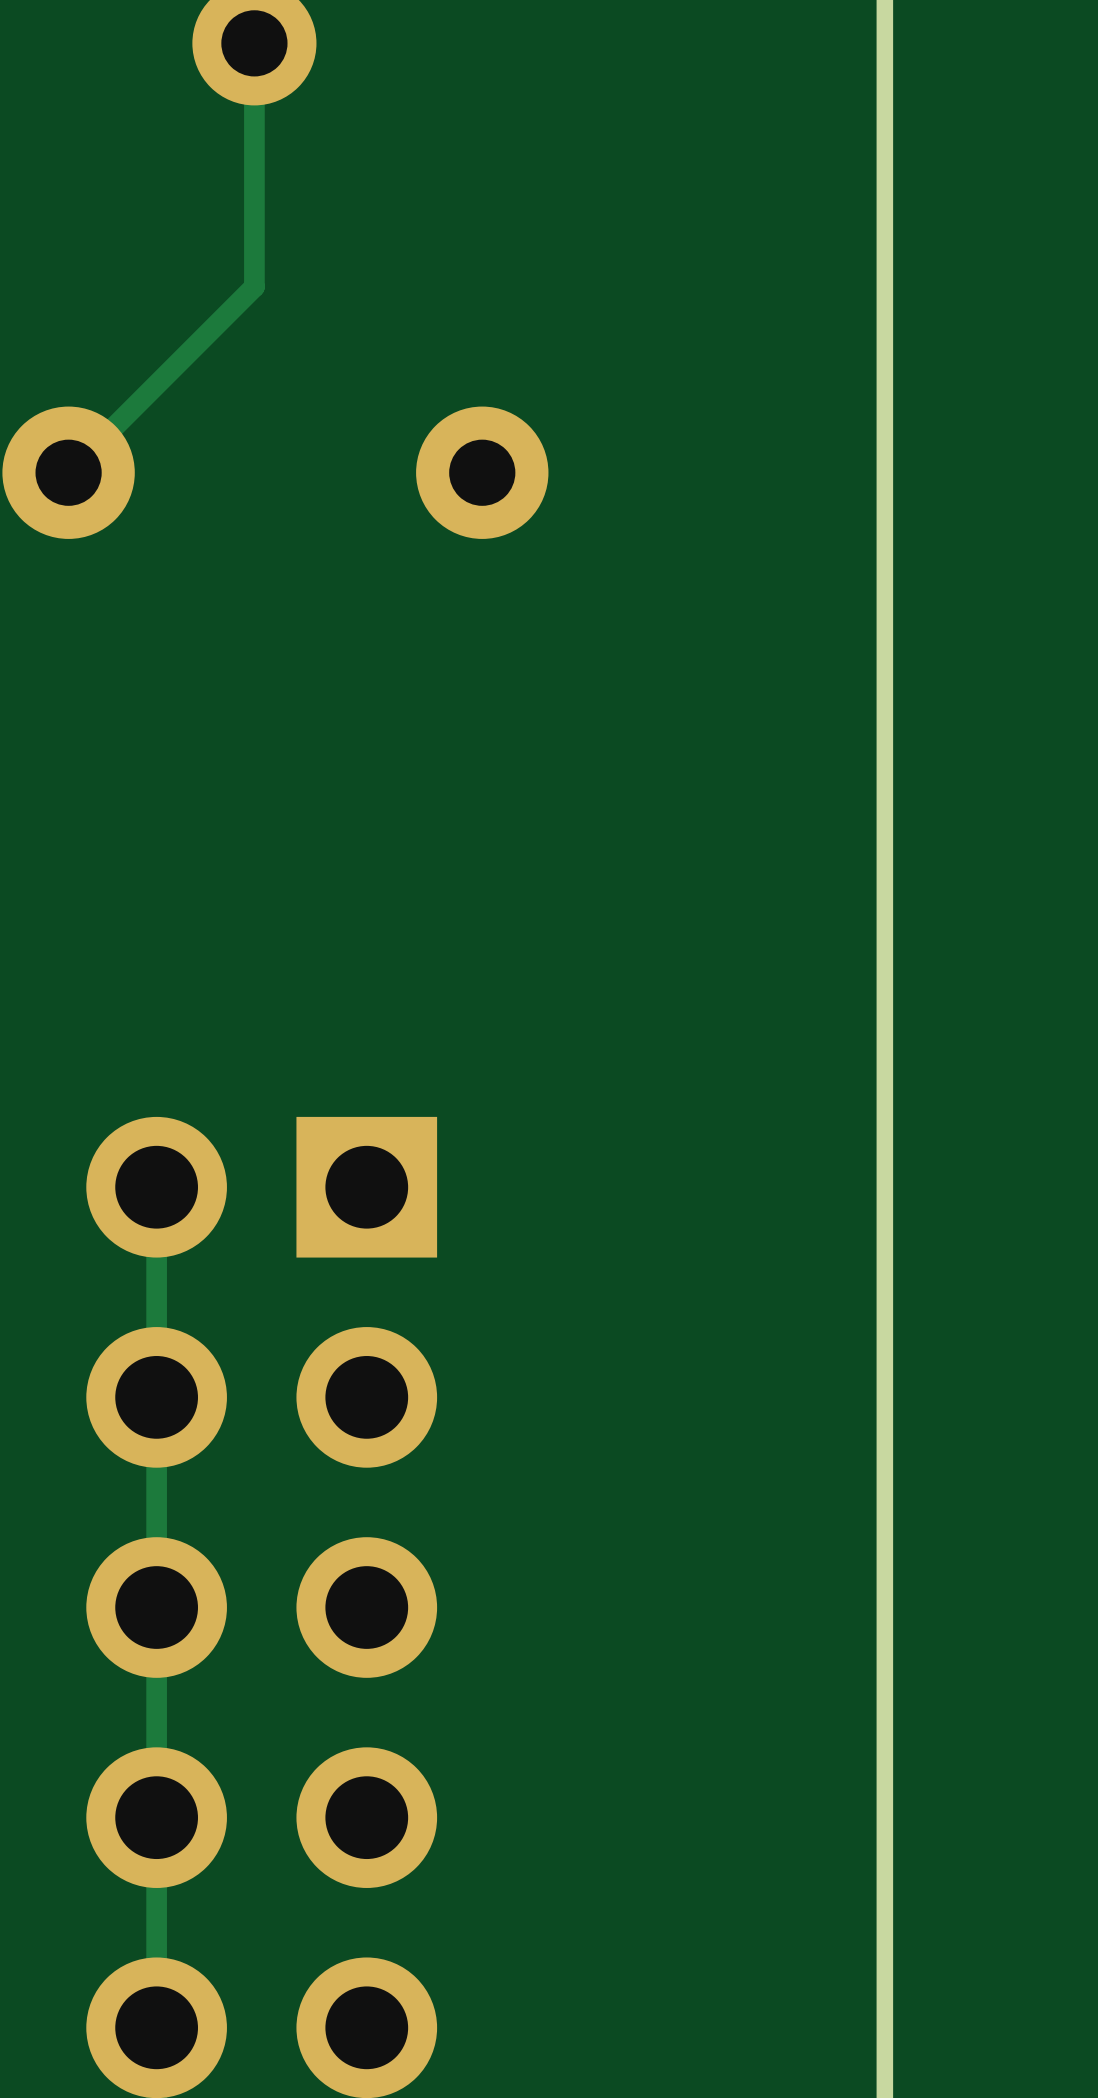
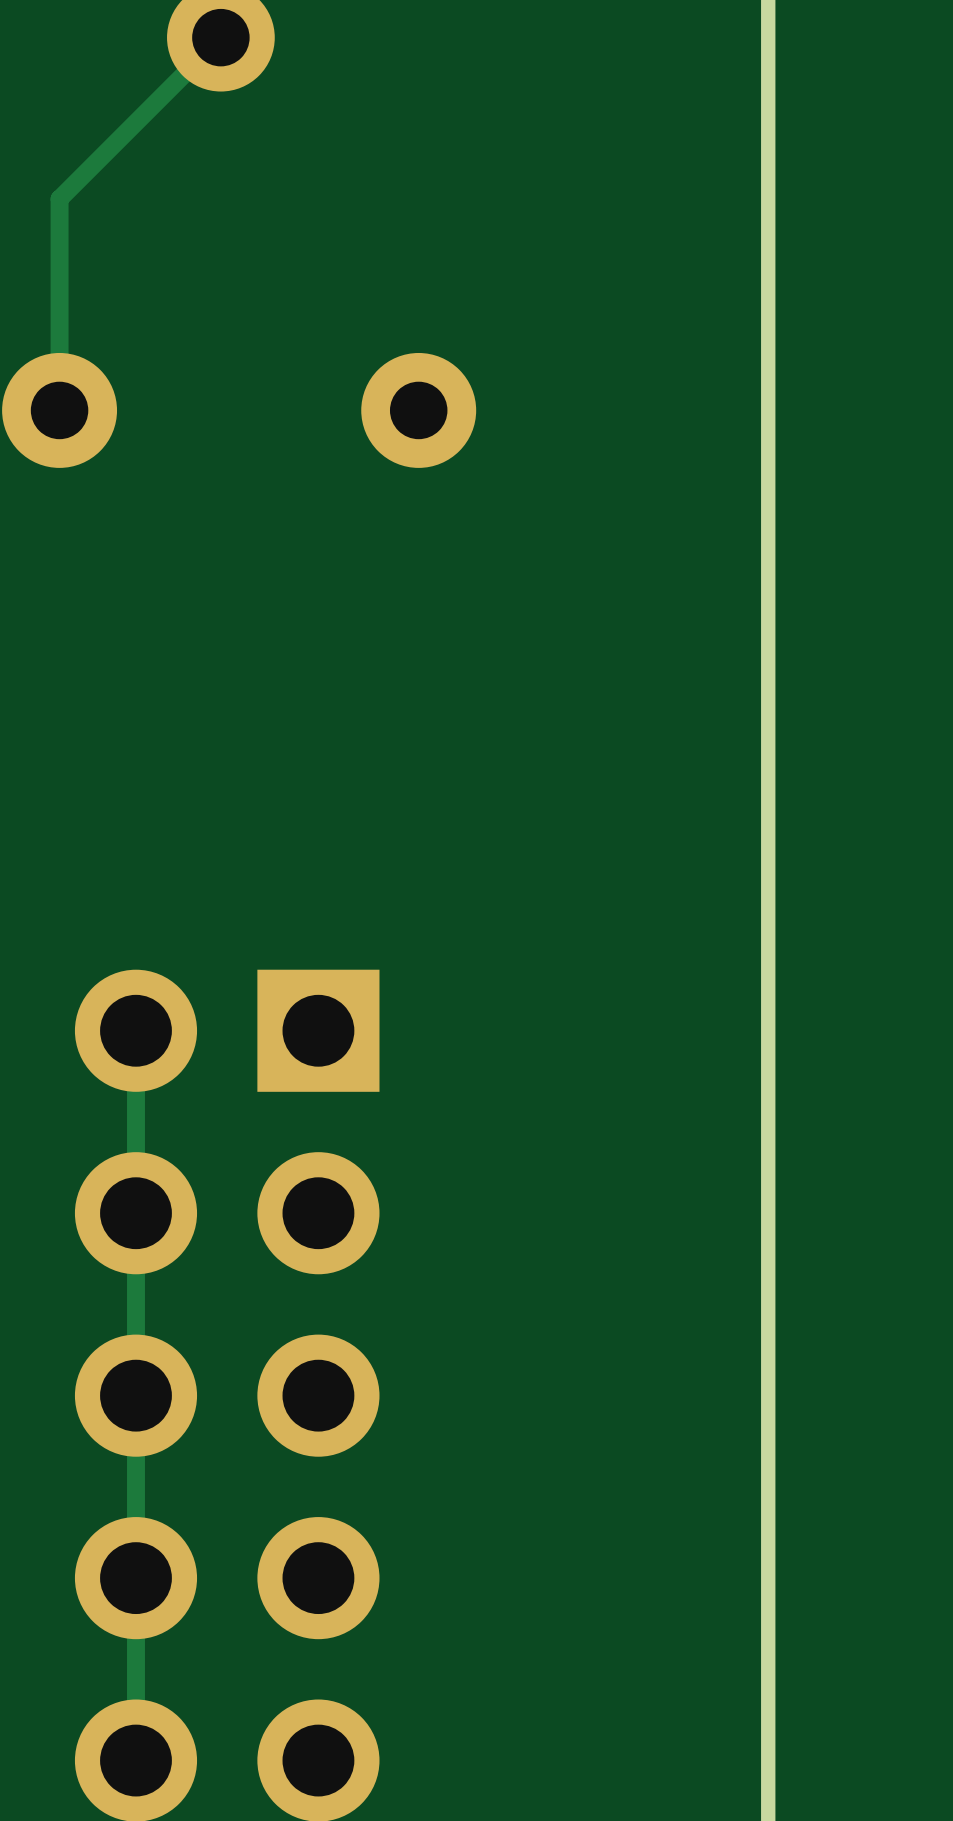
track: (254, 43) (254, 286) (68, 472) -> (220, 37) (59, 198) (59, 410)

